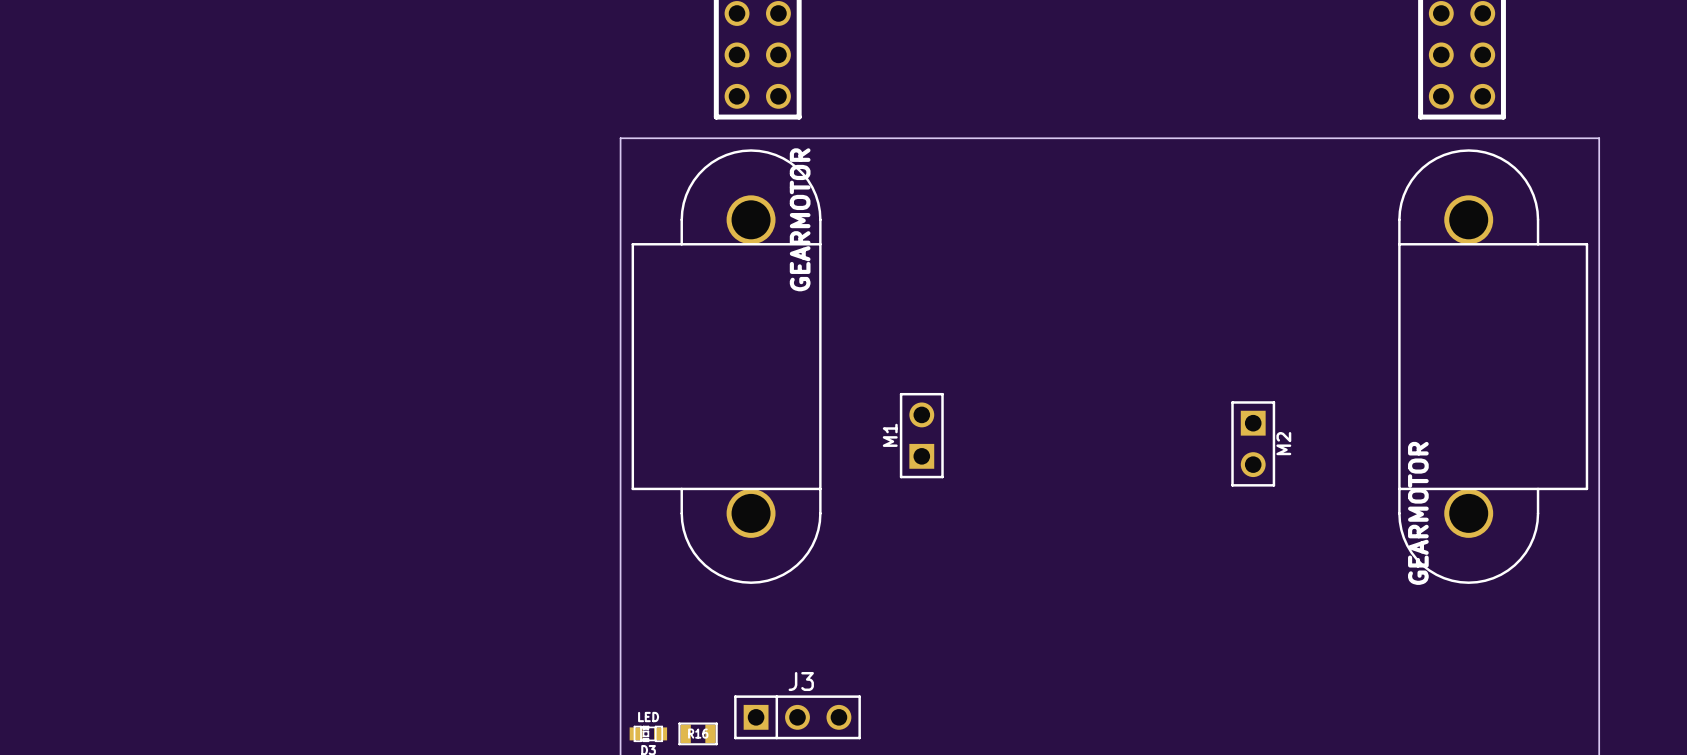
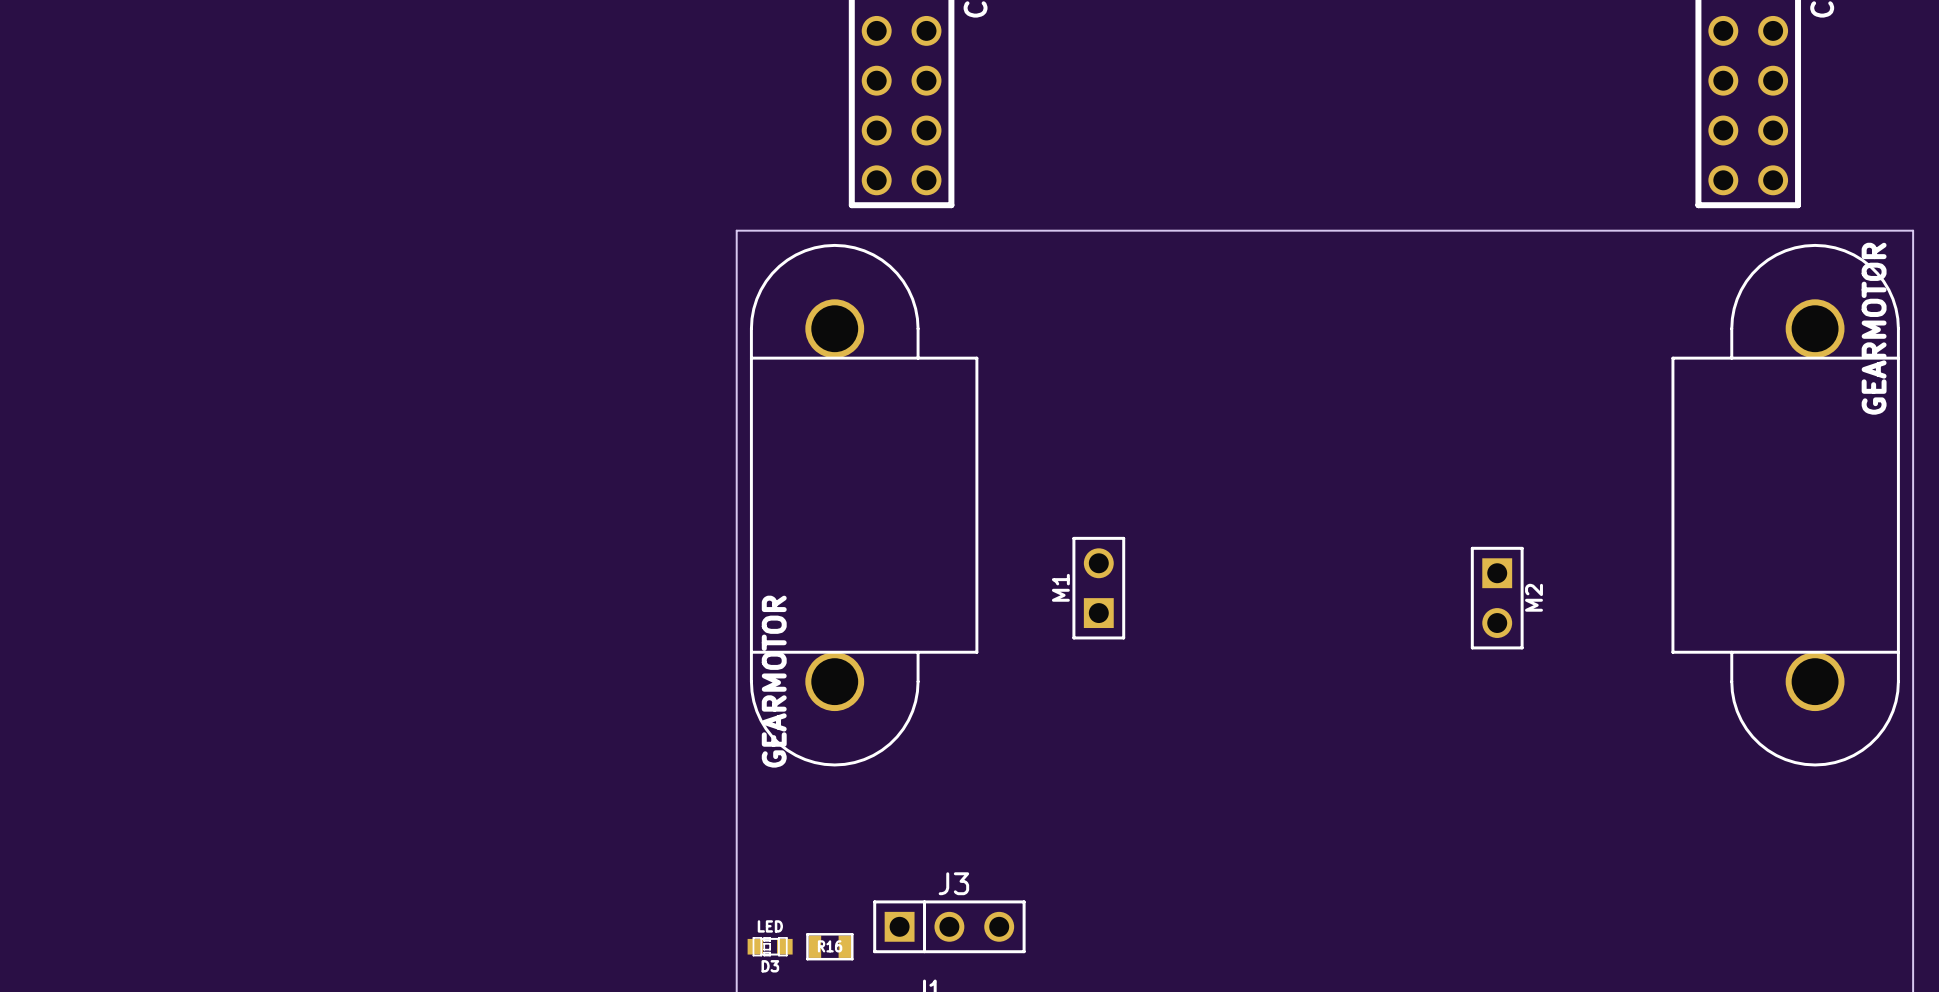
GEARMOTOR rotation: 0° (726, 366) -> 180° (864, 505)
GEARMOTOR rotation: 0° (1493, 366) -> 180° (1785, 505)

